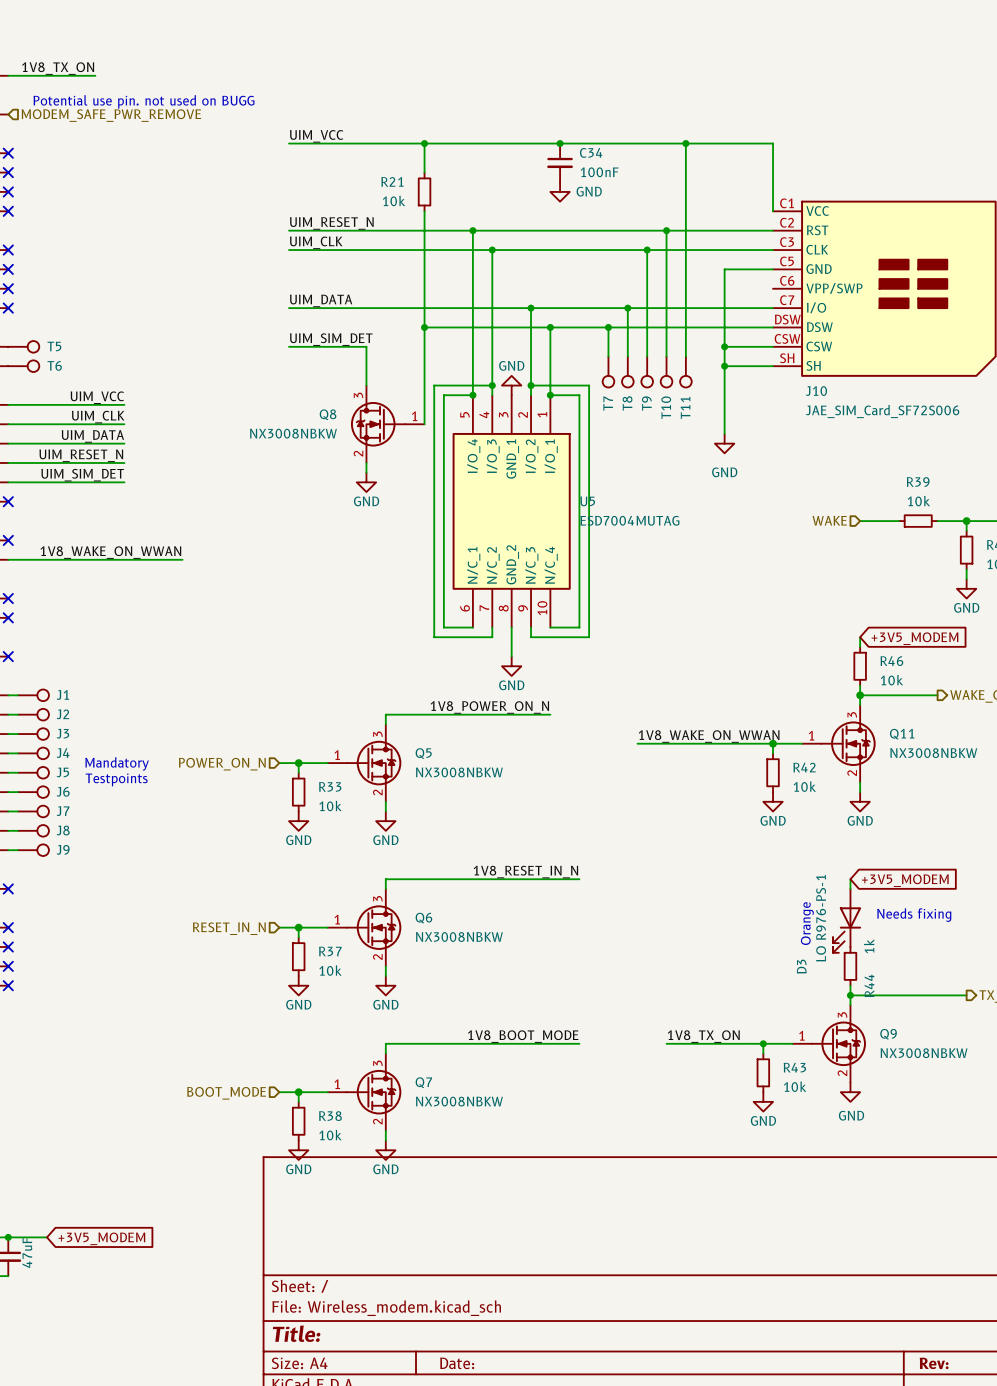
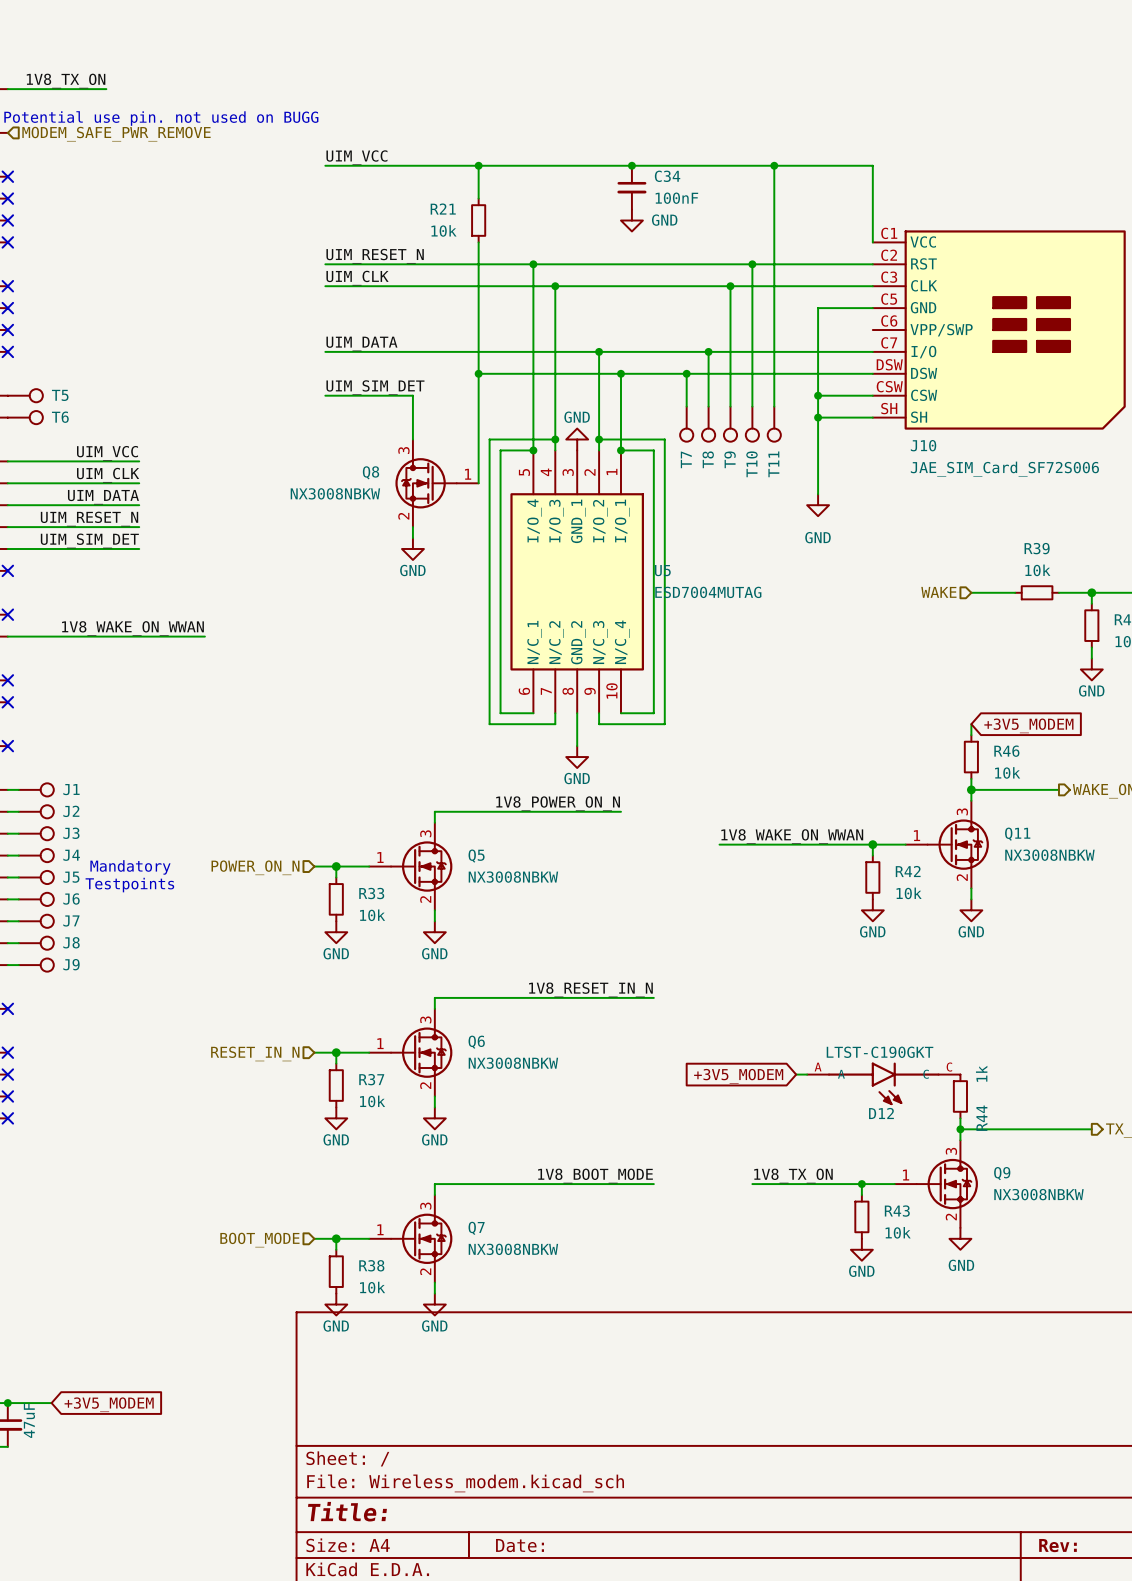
wire: (850, 879) (850, 888) -> none
global label rotation: 0° (905, 880) -> 180° (738, 1076)
global label position: +3V5_MODEM (905, 880) -> +3V5_MODEM (738, 1076)
text: Needs fixing (914, 915) -> none
D3: LO R976-PS-1 (847, 920) -> none
text: Orange (807, 923) -> none
wire: none -> (796, 1074) (807, 1074)
D12: none -> LTST-C190GKT (883, 1083)

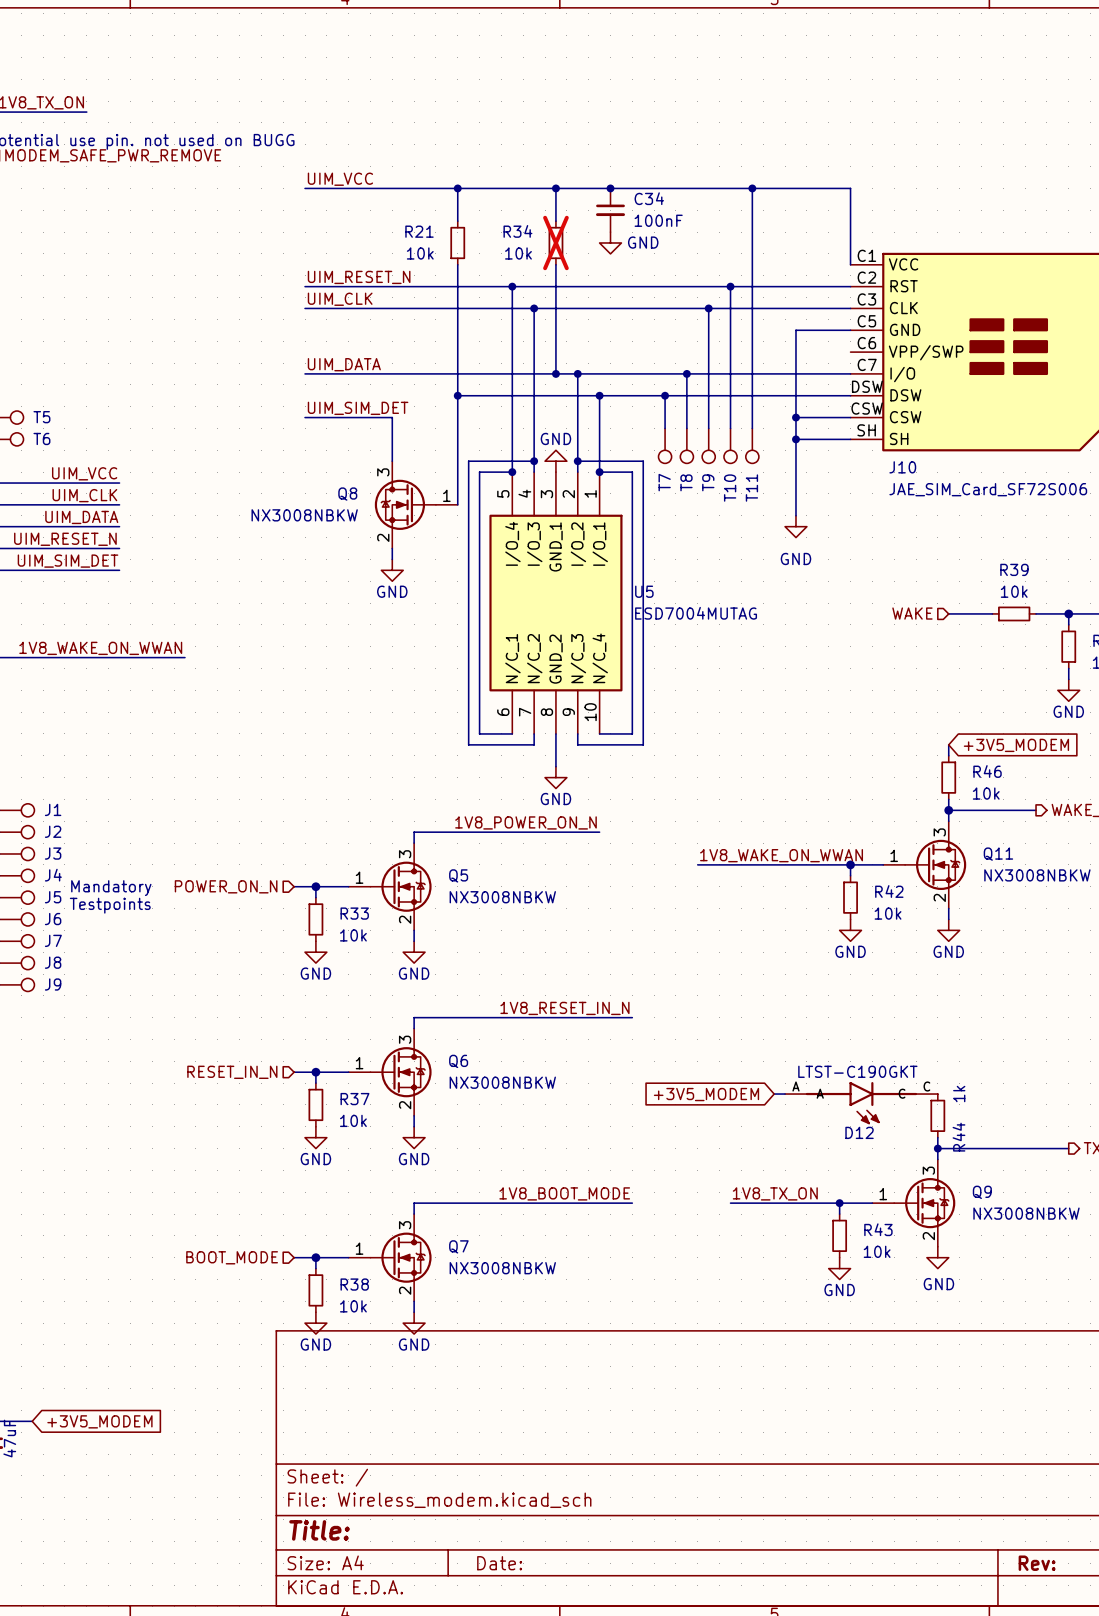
wire: none -> (555, 188) (555, 221)
junction: none -> (555, 188)
R34: none -> 10k (555, 242)
wire: none -> (555, 264) (555, 373)
junction: none -> (555, 373)

